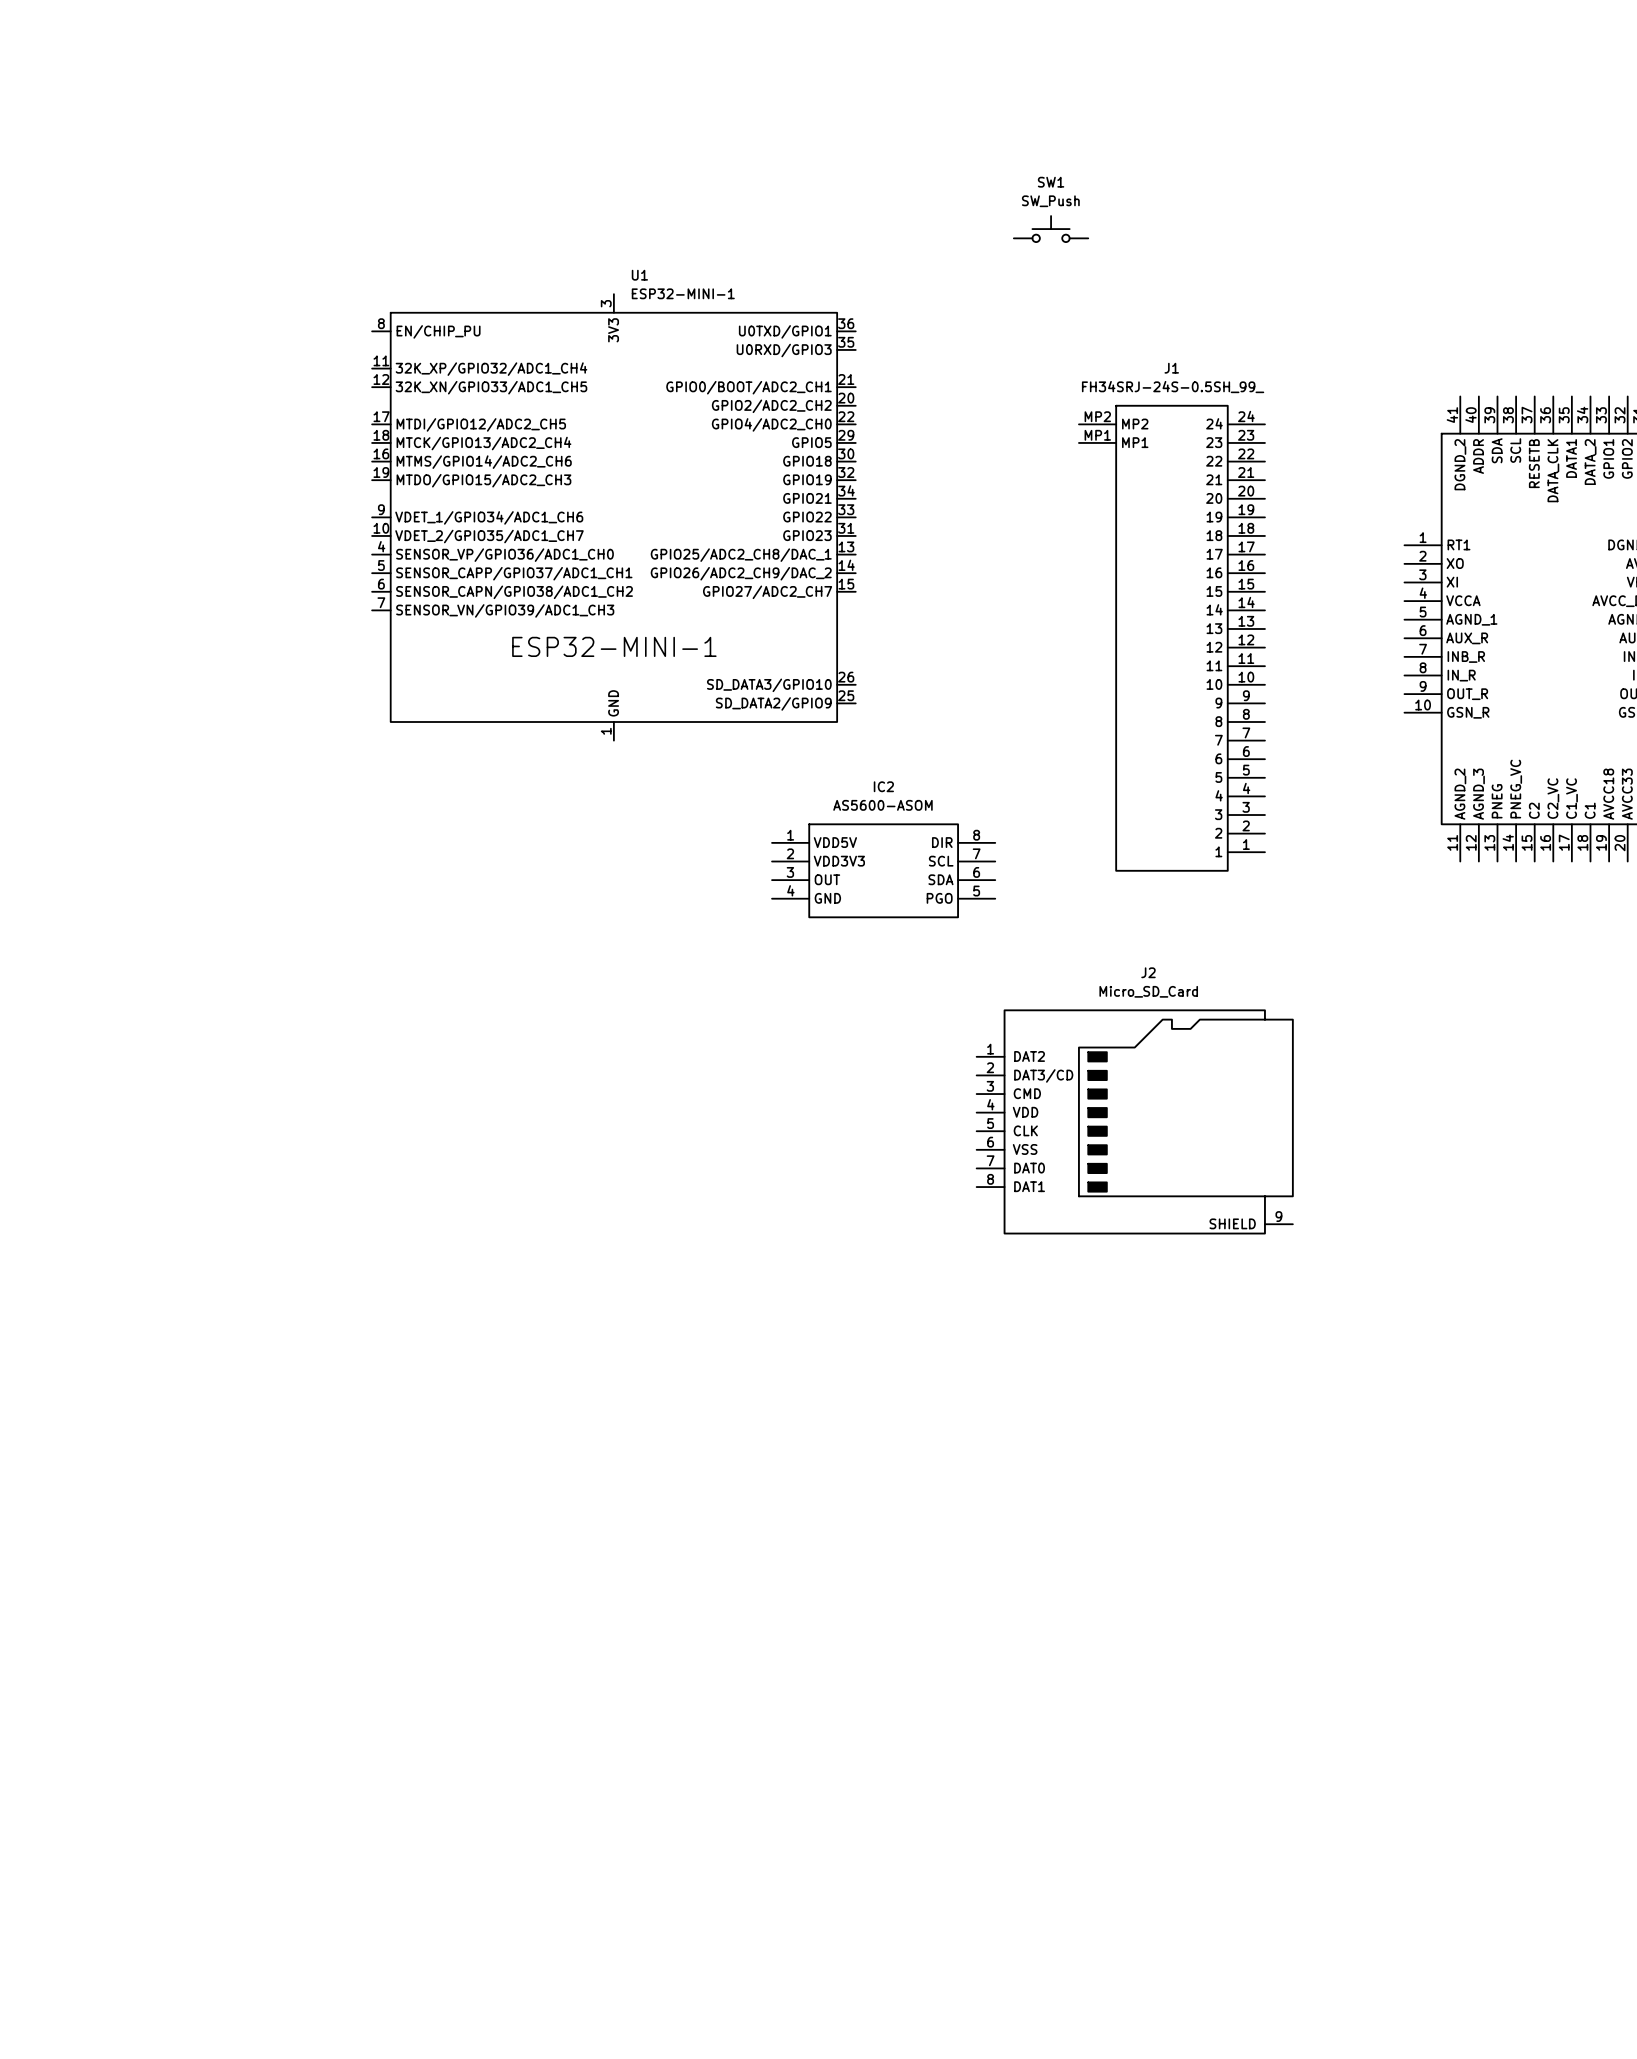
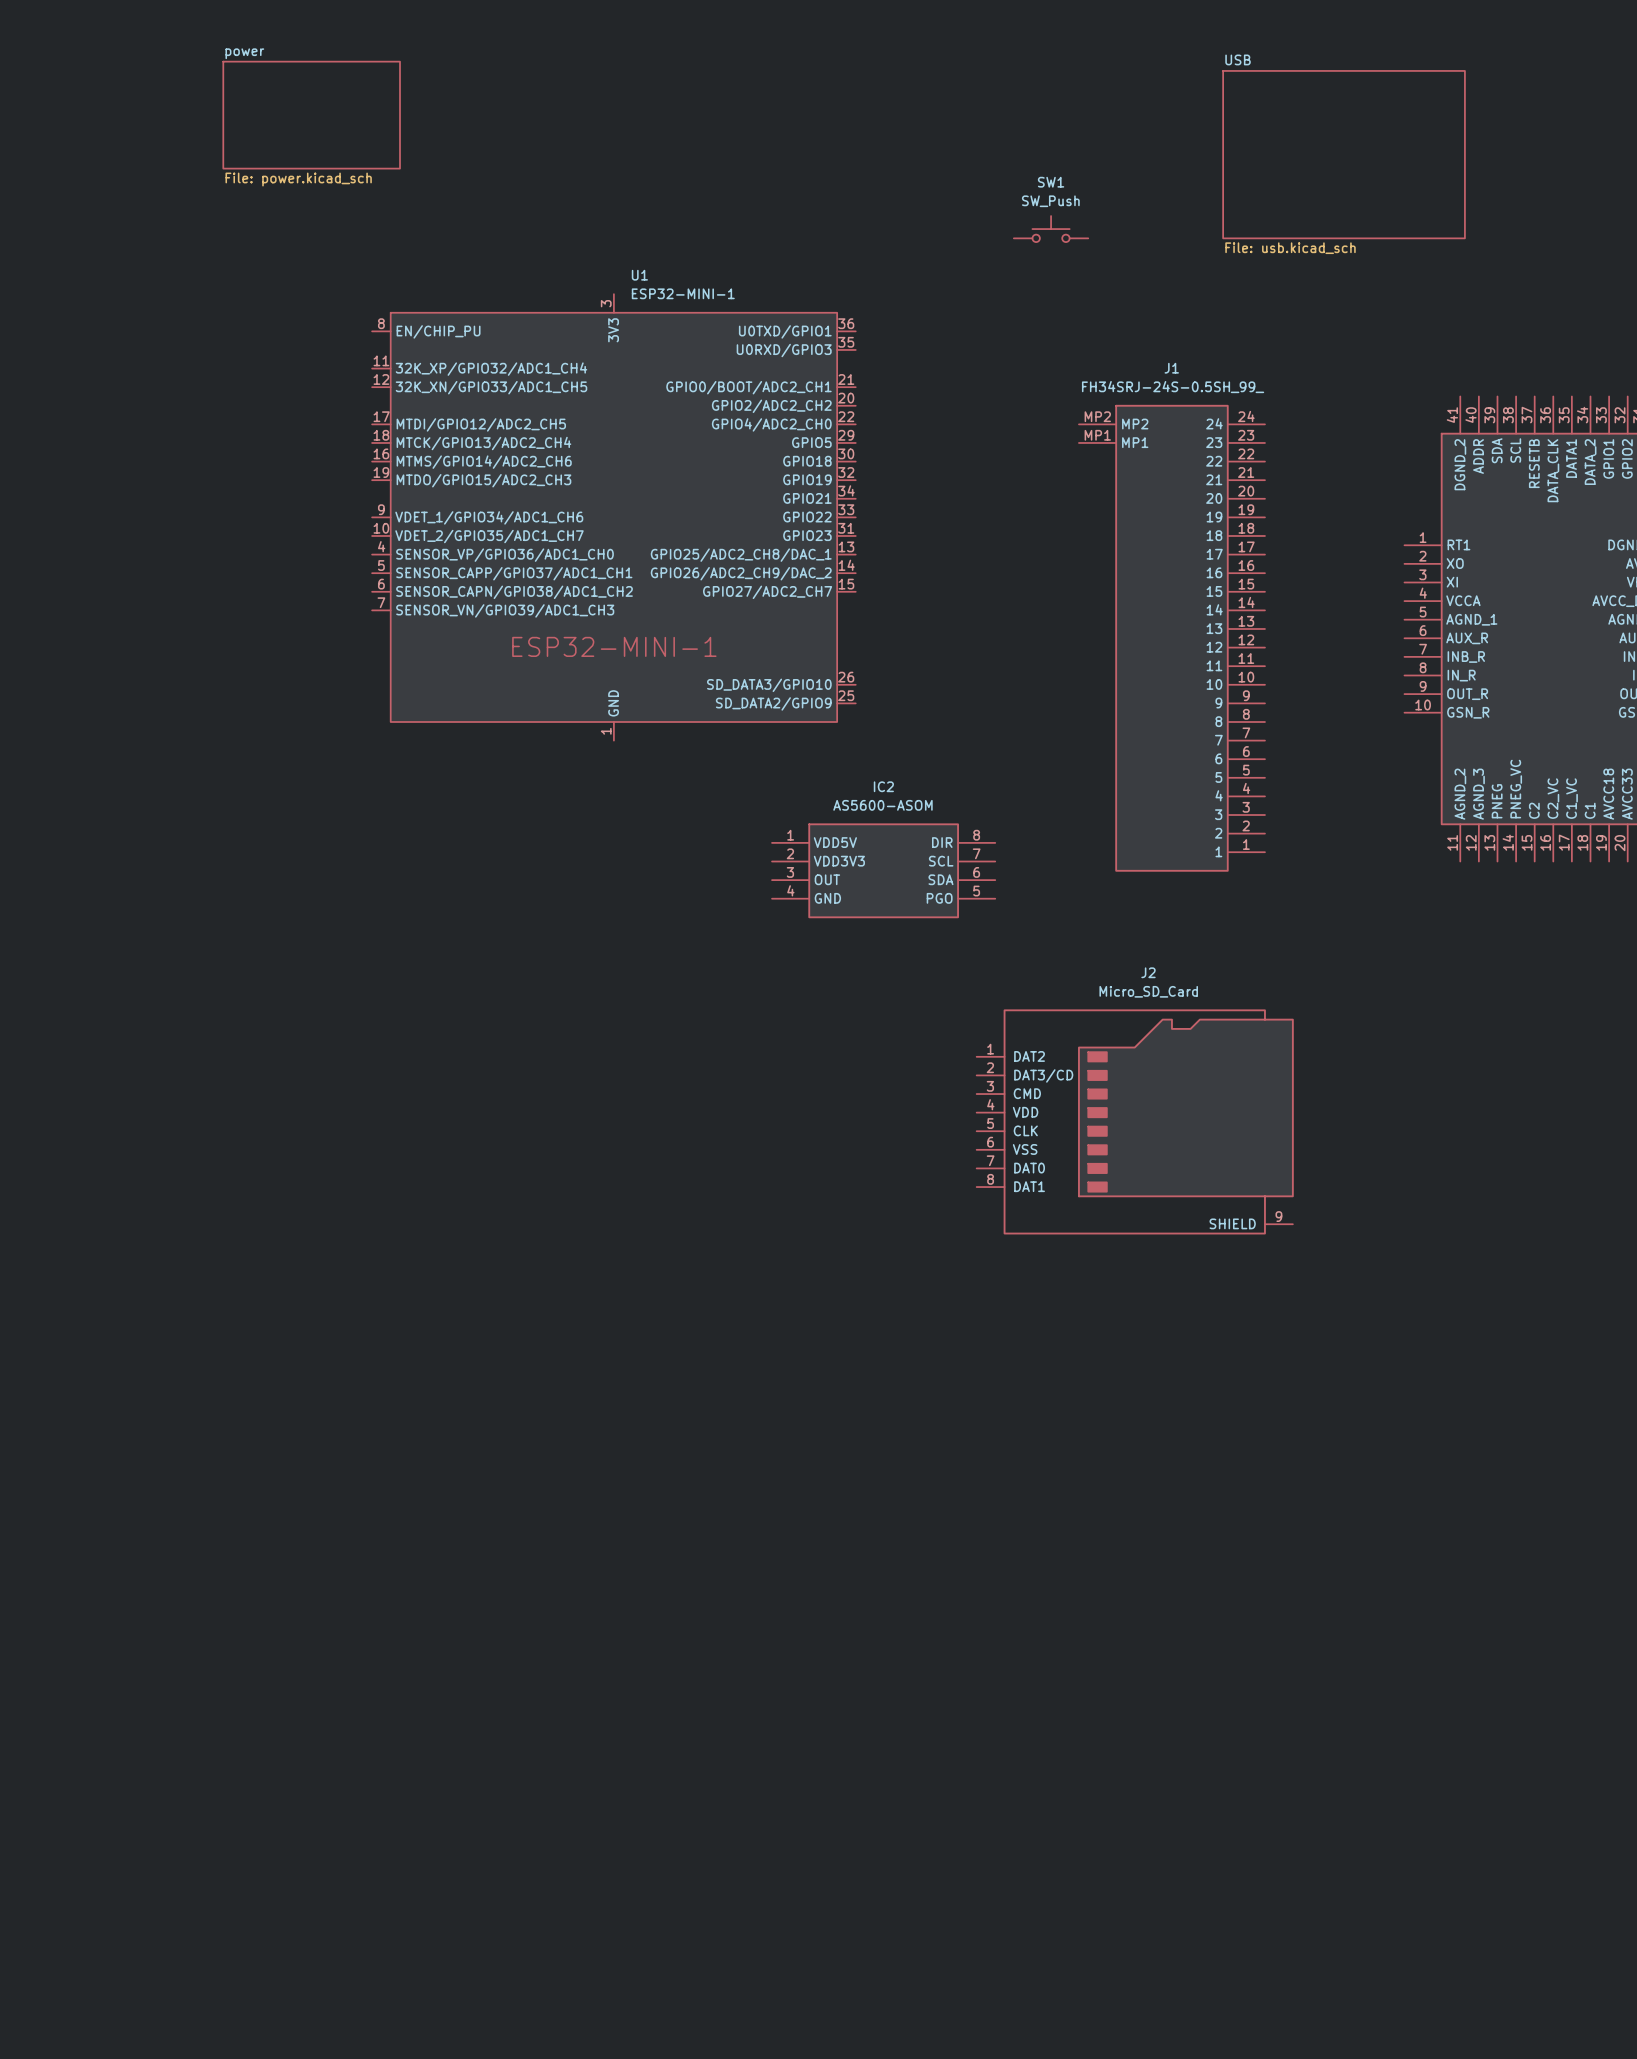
sheet power: none -> File: power.kicad_sch (311, 115)
sheet USB: none -> File: usb.kicad_sch (1344, 154)

